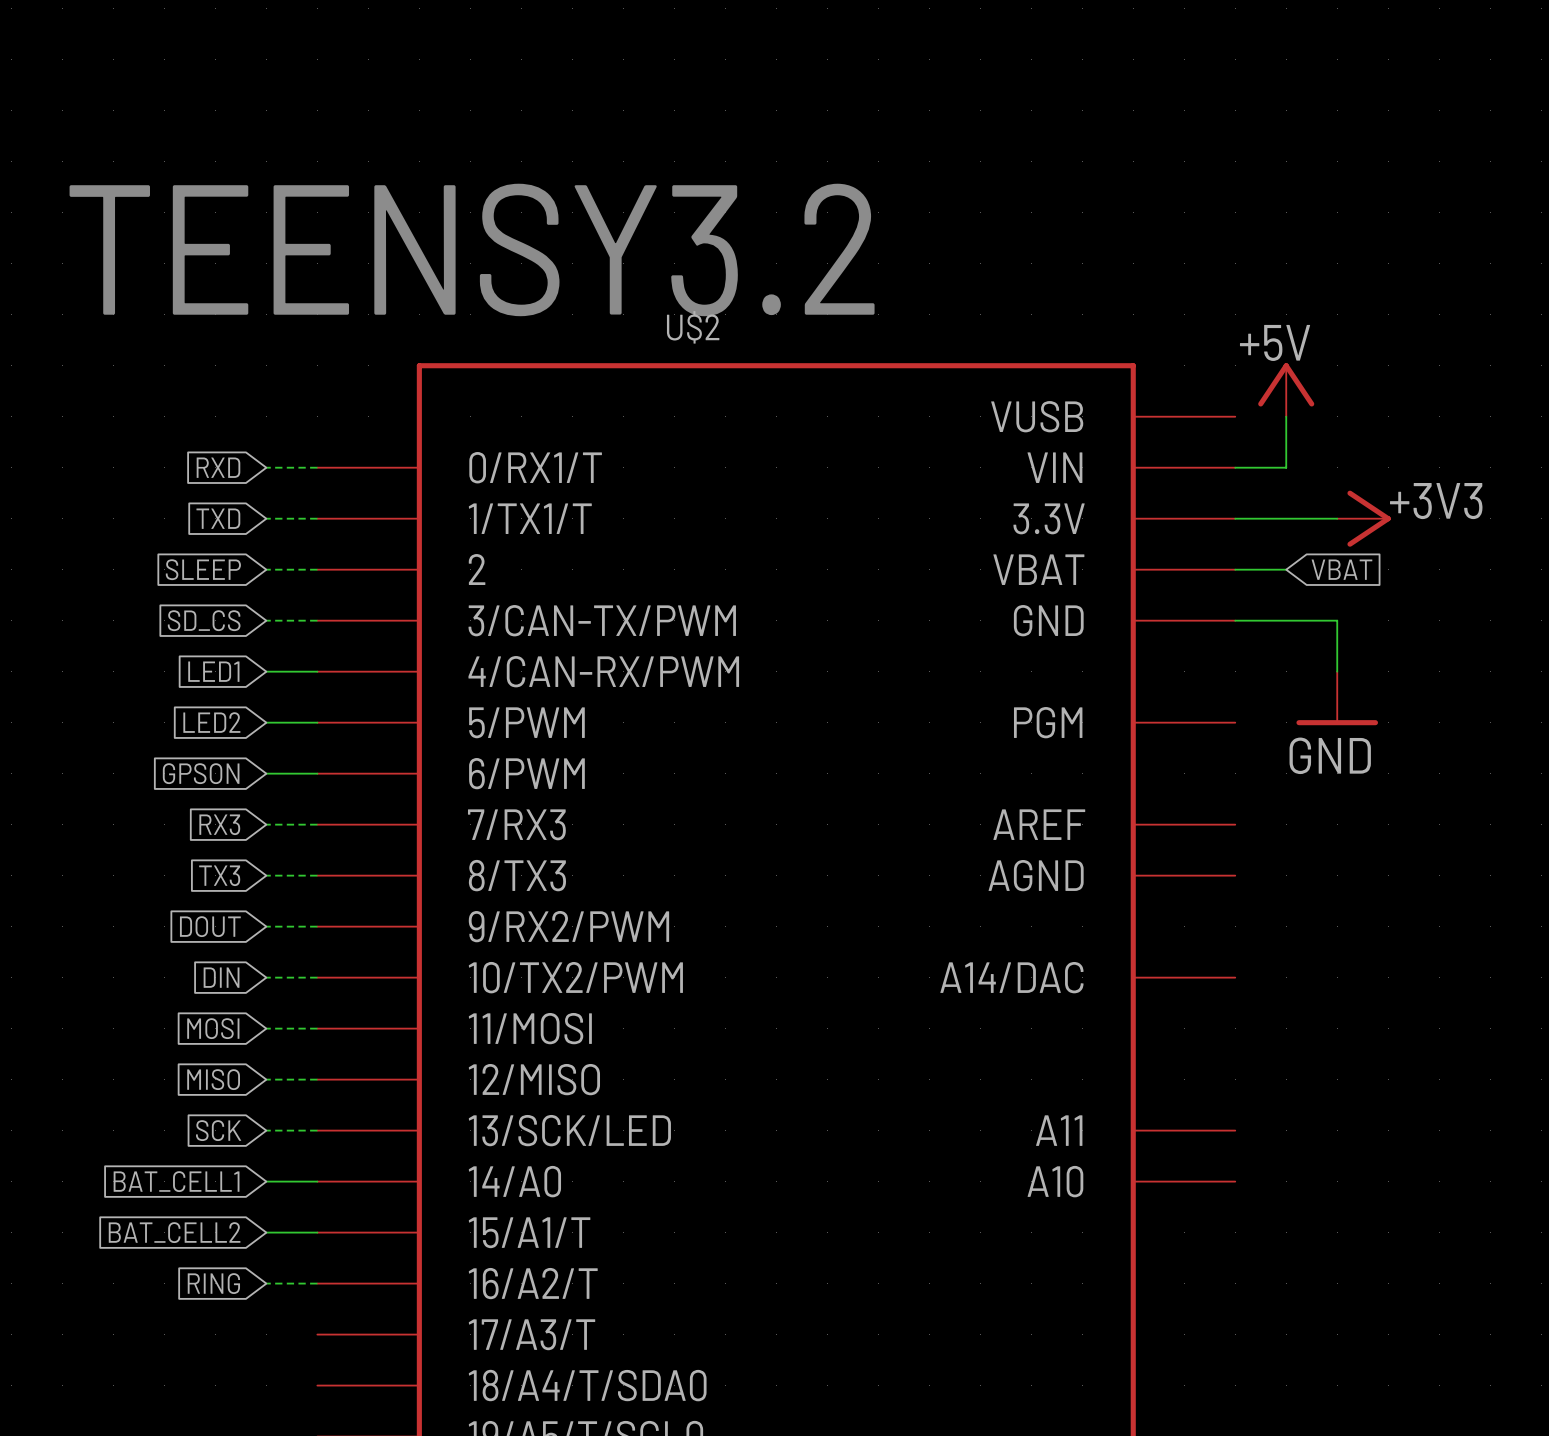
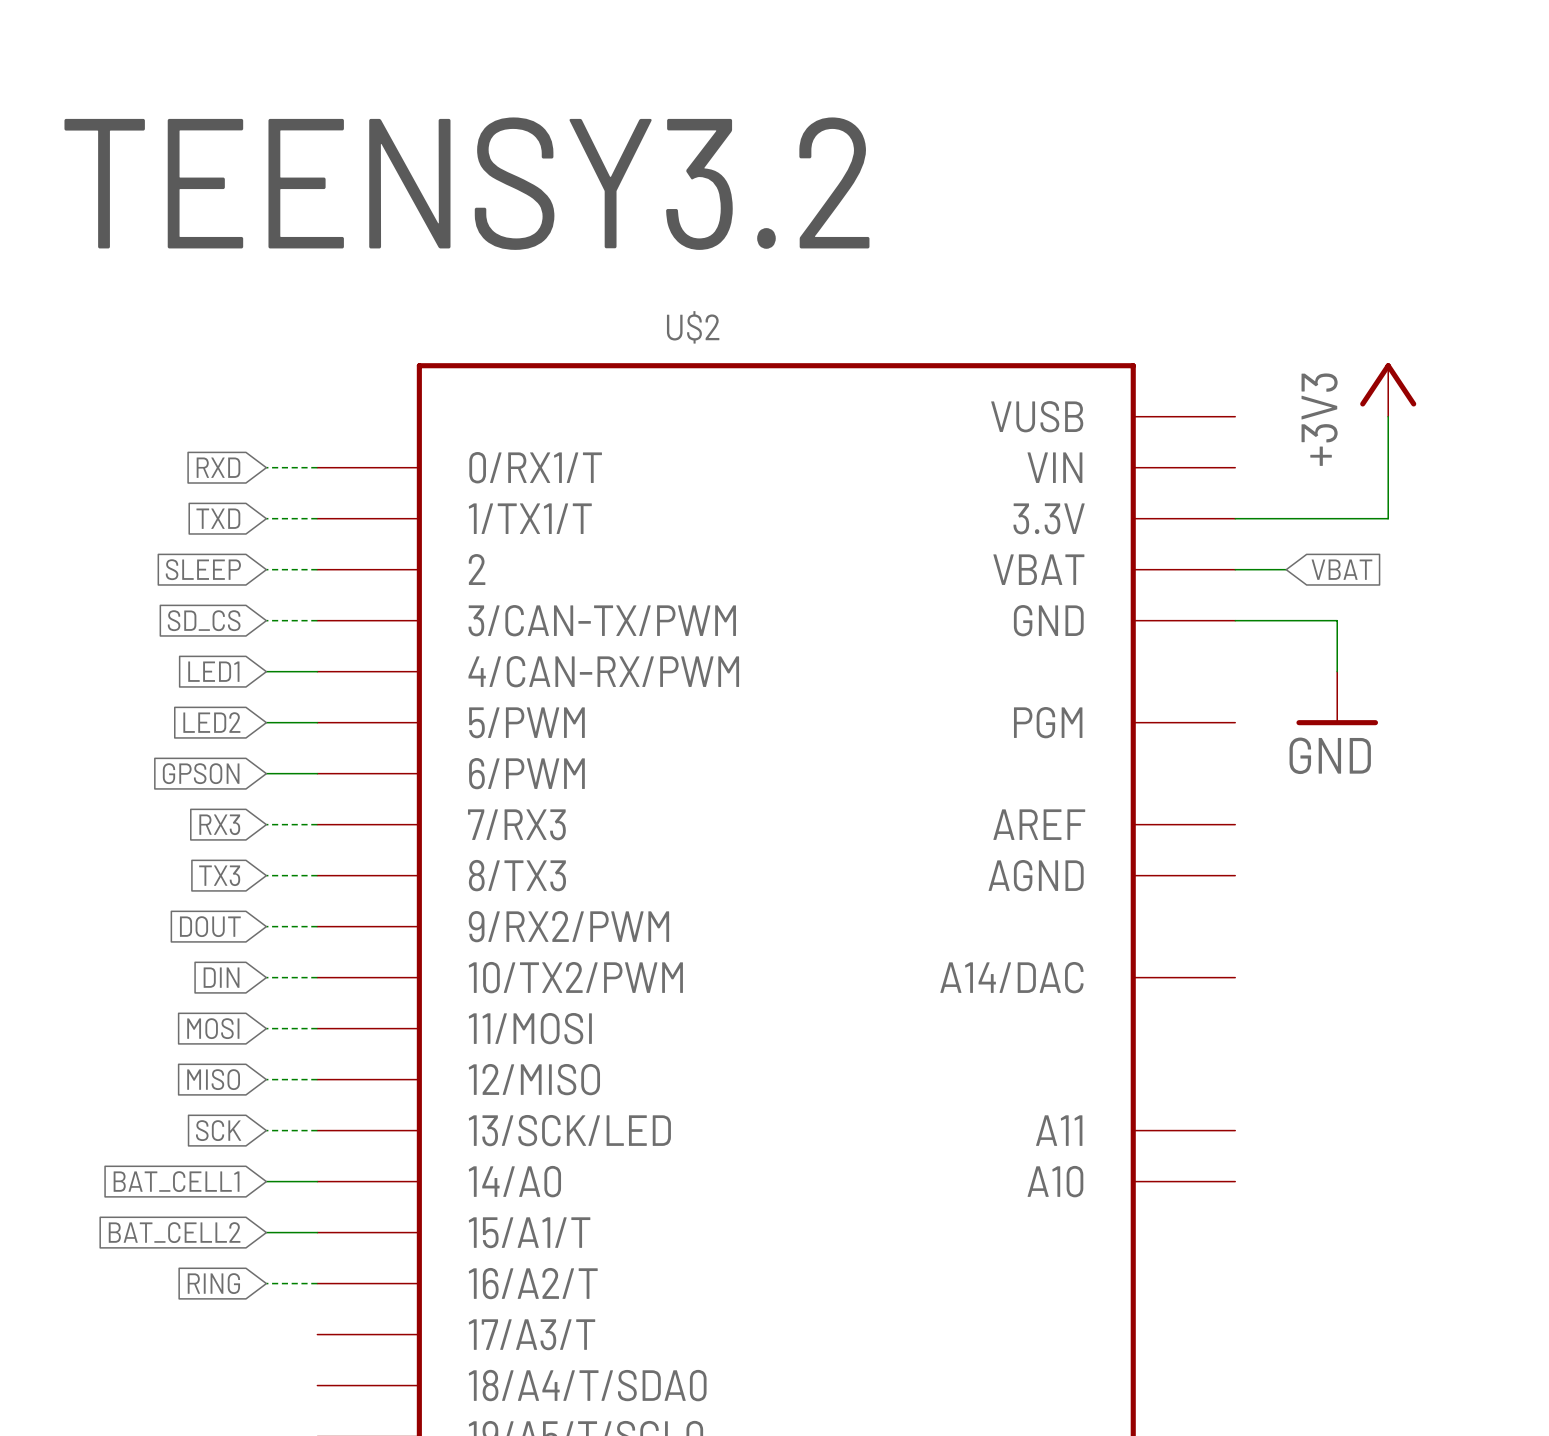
text position: TEENSY3.2 (472, 249) -> TEENSY3.2 (466, 183)
power symbol: +5V (1286, 389) -> none
wire: (1286, 416) (1286, 467) (1235, 467) -> none
wire: none -> (1388, 416) (1388, 518) (1337, 518)
power symbol text position: +3V3 (1436, 501) -> +3V3 (1319, 419)
power symbol position: +3V3 (1364, 518) -> +3V3 (1388, 389)
power symbol rotation: 0° (1369, 518) -> 90° counterclockwise (1388, 384)

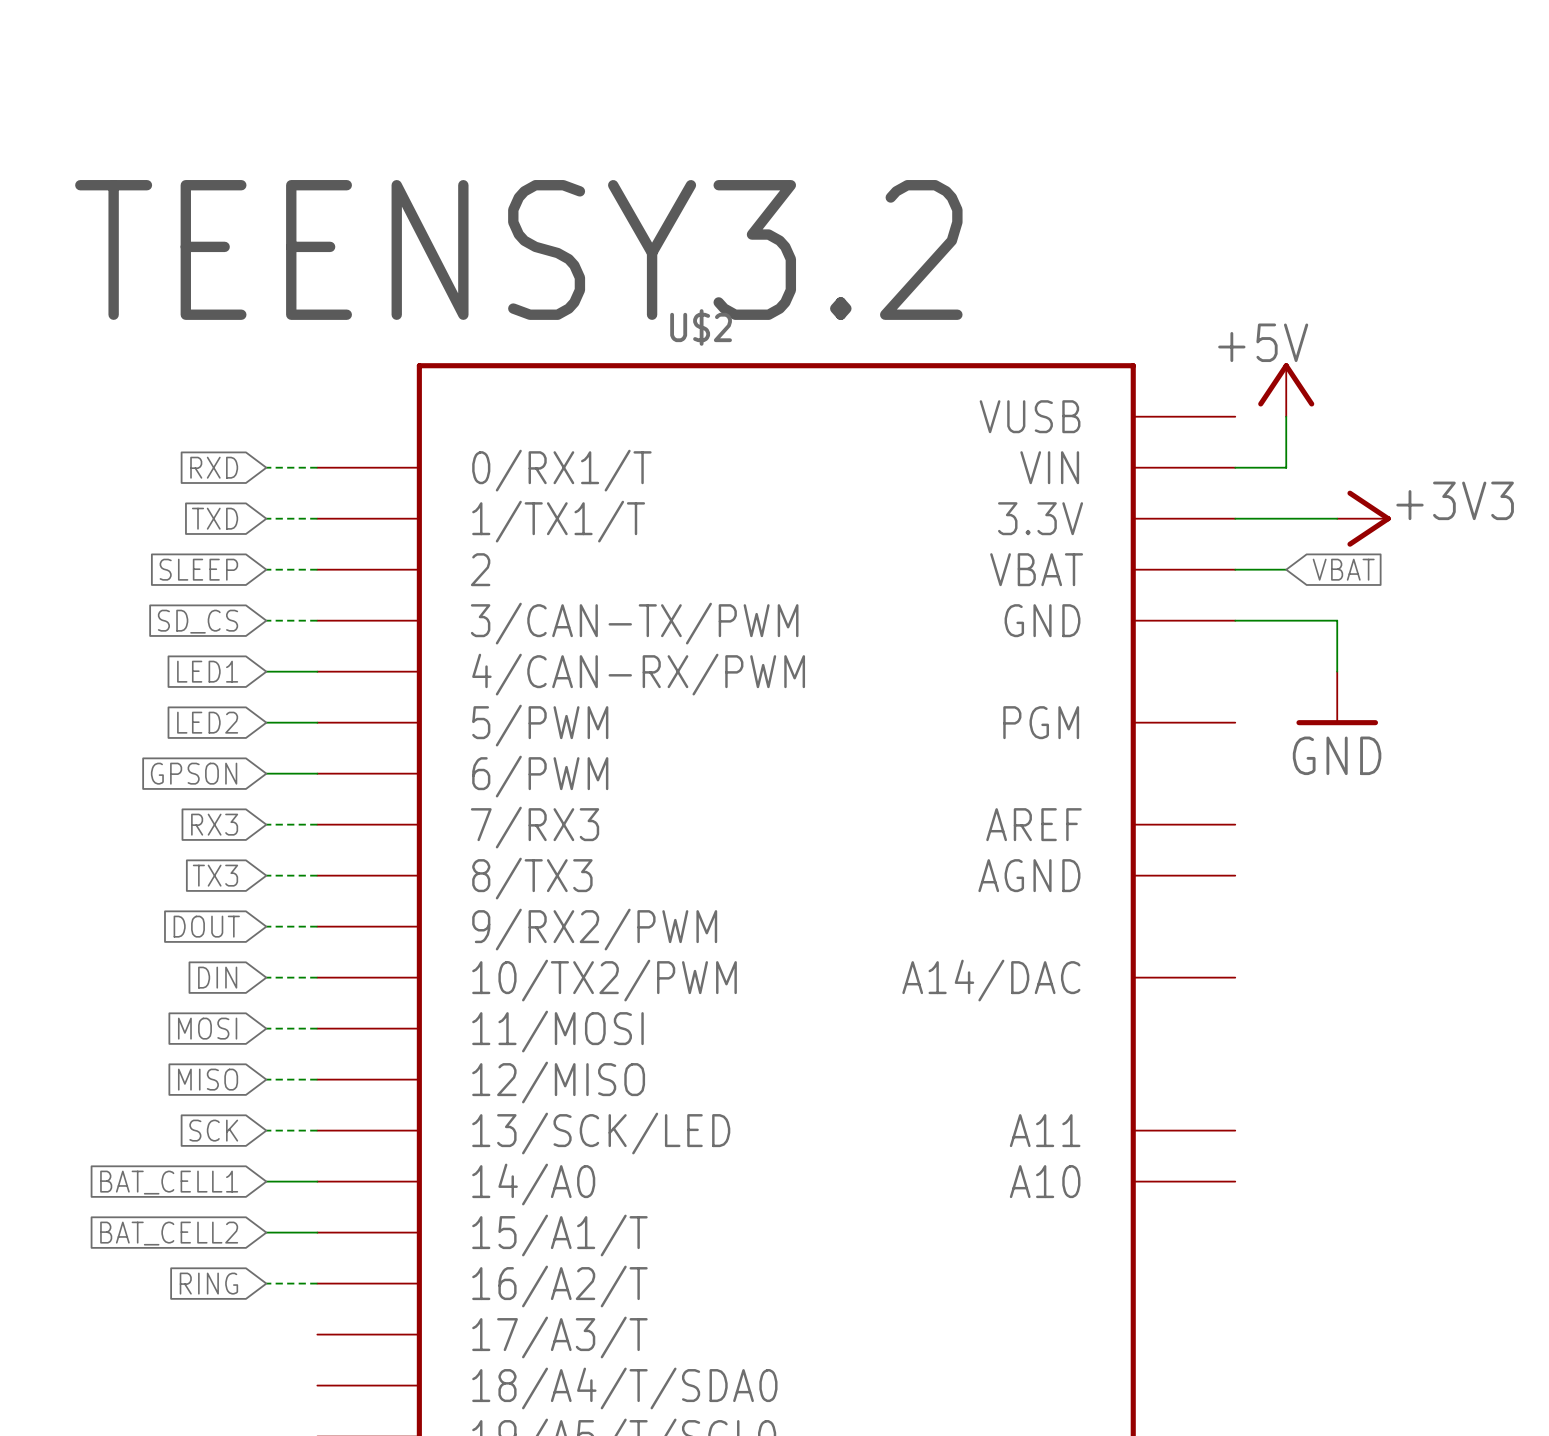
text position: TEENSY3.2 (466, 183) -> TEENSY3.2 (518, 249)
power symbol rotation: 0° (1388, 384) -> 90° clockwise (1369, 518)
power symbol: none -> +5V (1286, 389)
power symbol position: +3V3 (1388, 389) -> +3V3 (1364, 518)
wire: none -> (1286, 416) (1286, 467) (1235, 467)
wire: (1388, 416) (1388, 518) (1337, 518) -> none
power symbol text position: +3V3 (1319, 419) -> +3V3 (1455, 500)

